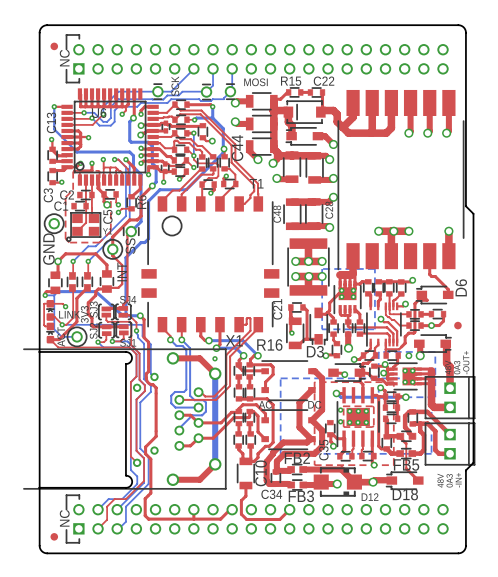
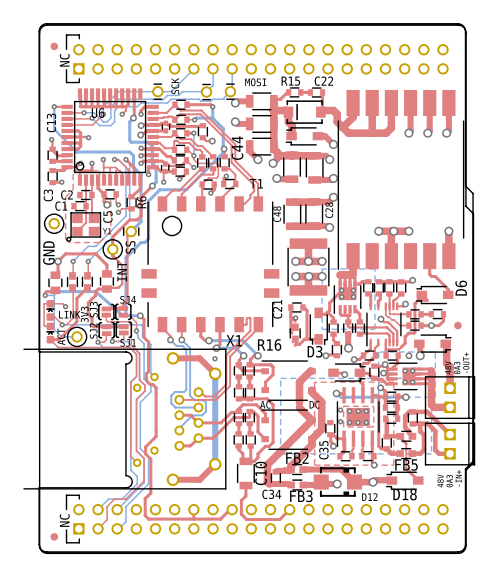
R16 footprint: [286, 317, 305, 350] -> [289, 323, 301, 344]
via position: (291, 333) -> (295, 318)
board edge: none -> (39, 351) (39, 31) (42, 25) (46, 23) (457, 23) (463, 26) (465, 31) (465, 185) (473, 193) (473, 461) (465, 468) (465, 544) (463, 549) (457, 551) (45, 551) (41, 549) (39, 545) (39, 487)
top track: (311, 371) (314, 371) (322, 378) (322, 410) (311, 420) (322, 430) (322, 446) (314, 453) (284, 453) (276, 461) (275, 471) -> (311, 390) (321, 402) (321, 429) (311, 439) (311, 445) (291, 465) (291, 469) (284, 468) (281, 471) (275, 471)
top track: (311, 390) (299, 402) -> (311, 371) (299, 382) (299, 402)
top track: (299, 407) (299, 427) (311, 439) -> none
top track: (311, 439) (307, 442) (283, 442) (273, 452) (266, 461) (266, 480) (269, 484) -> (299, 407) (311, 420) (267, 464) (267, 482) (269, 484)

